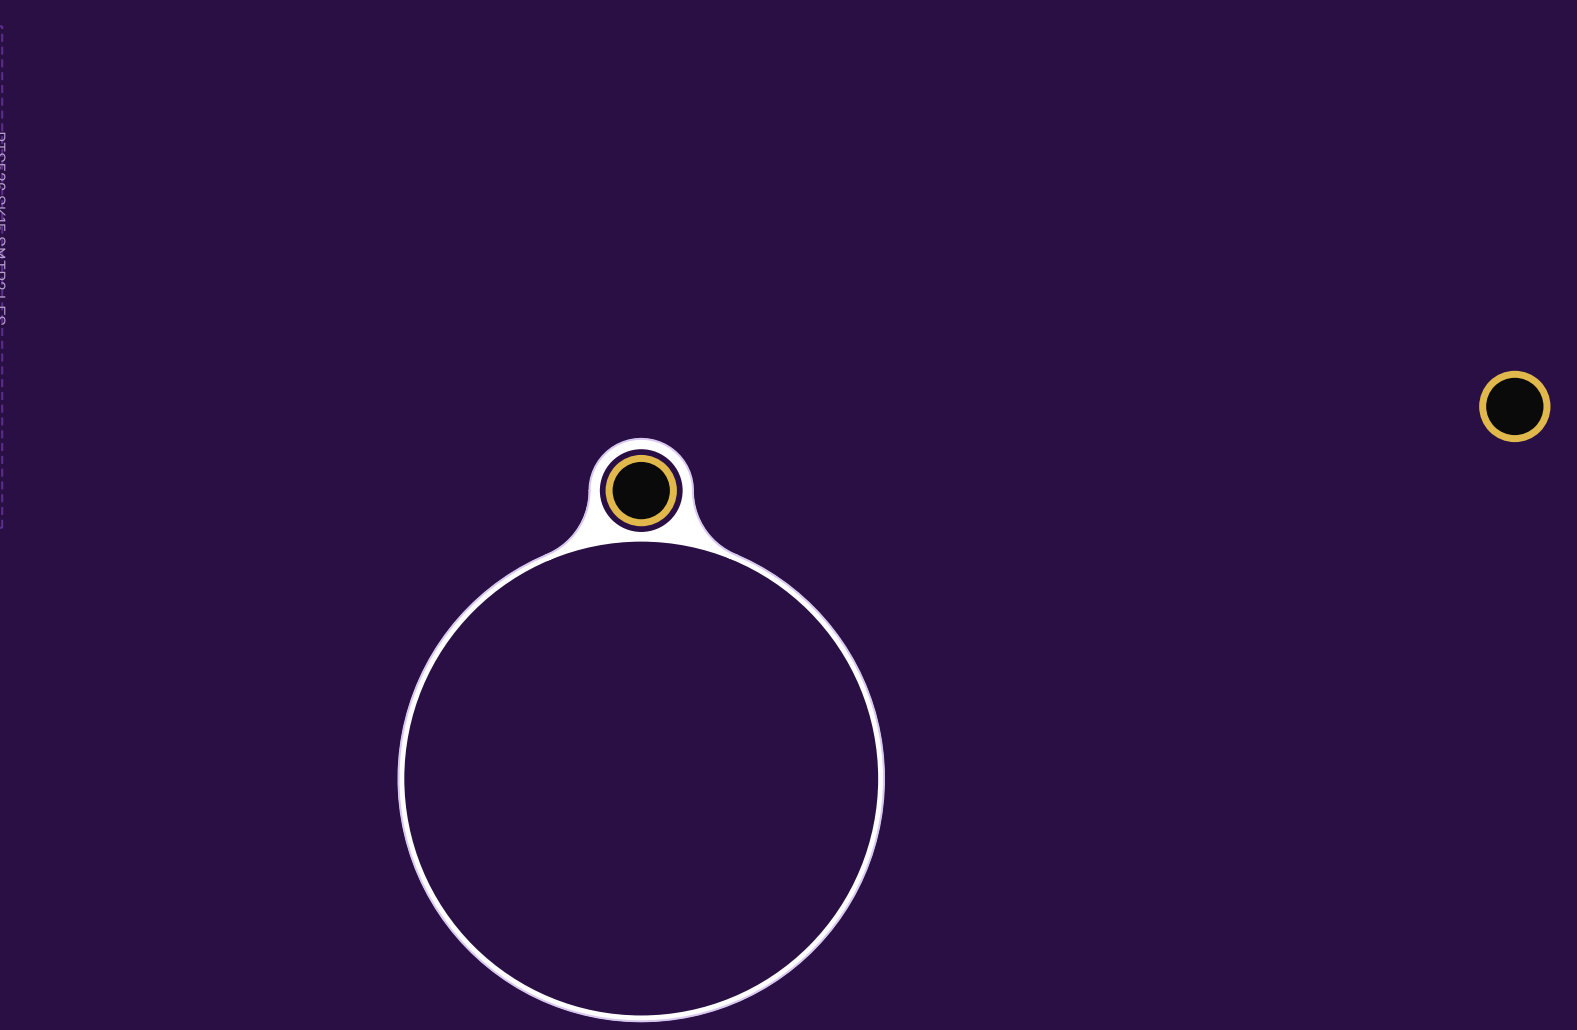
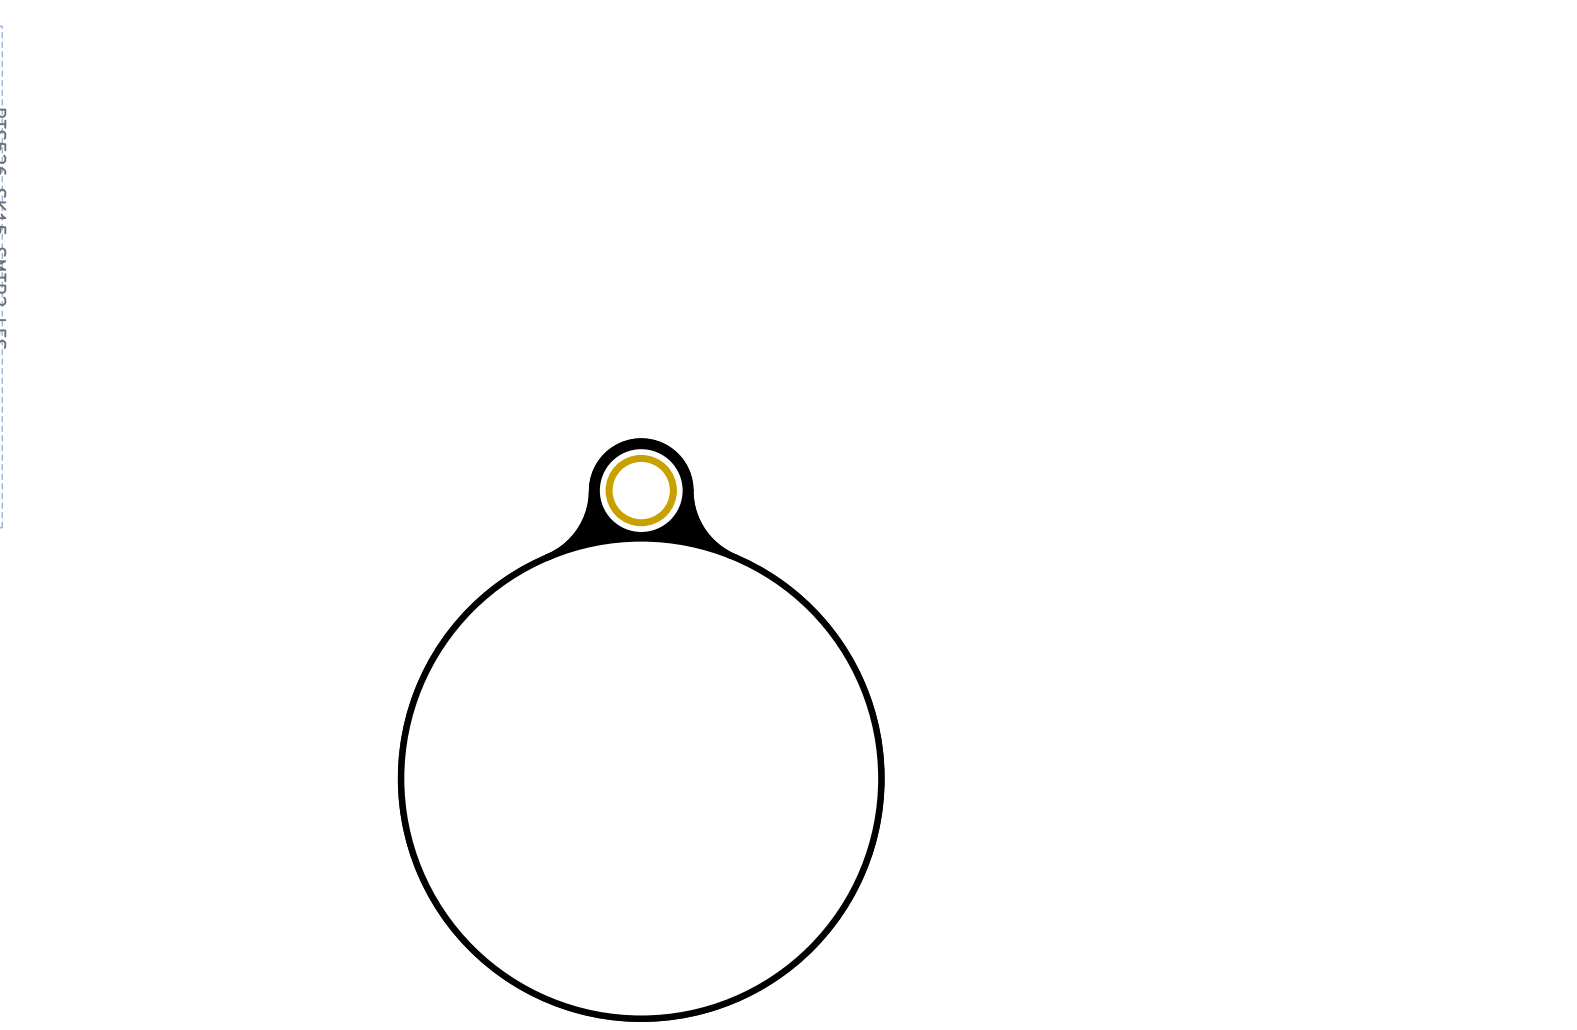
part: (1514, 406) -> none

